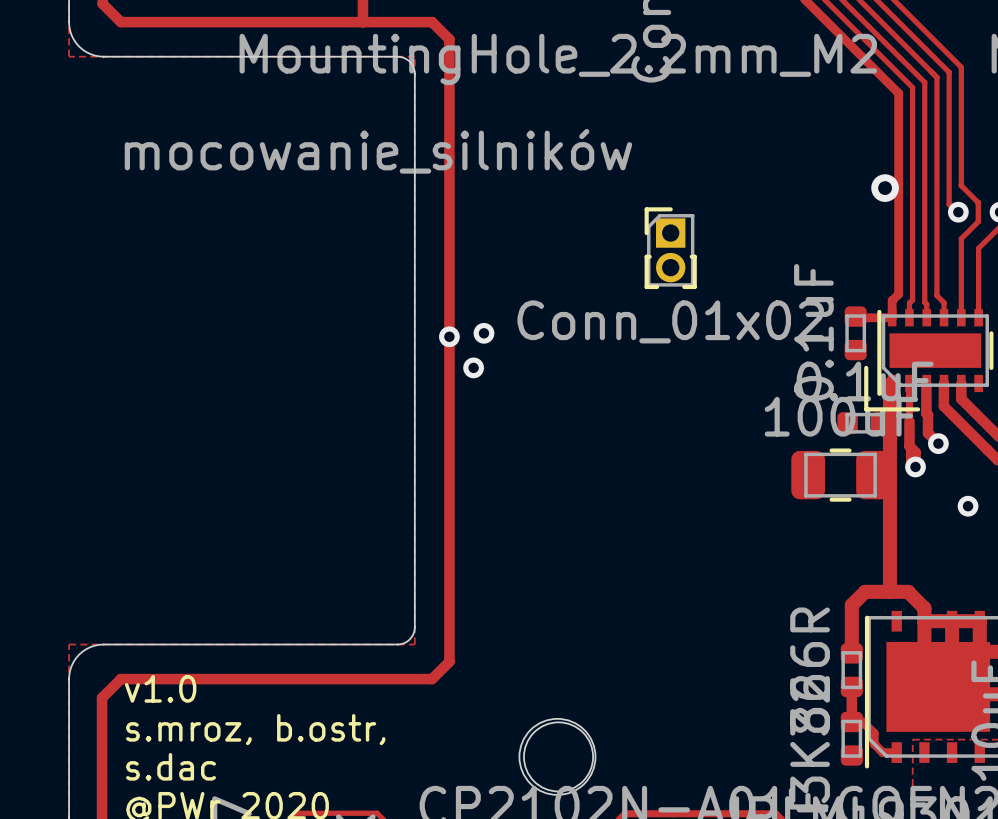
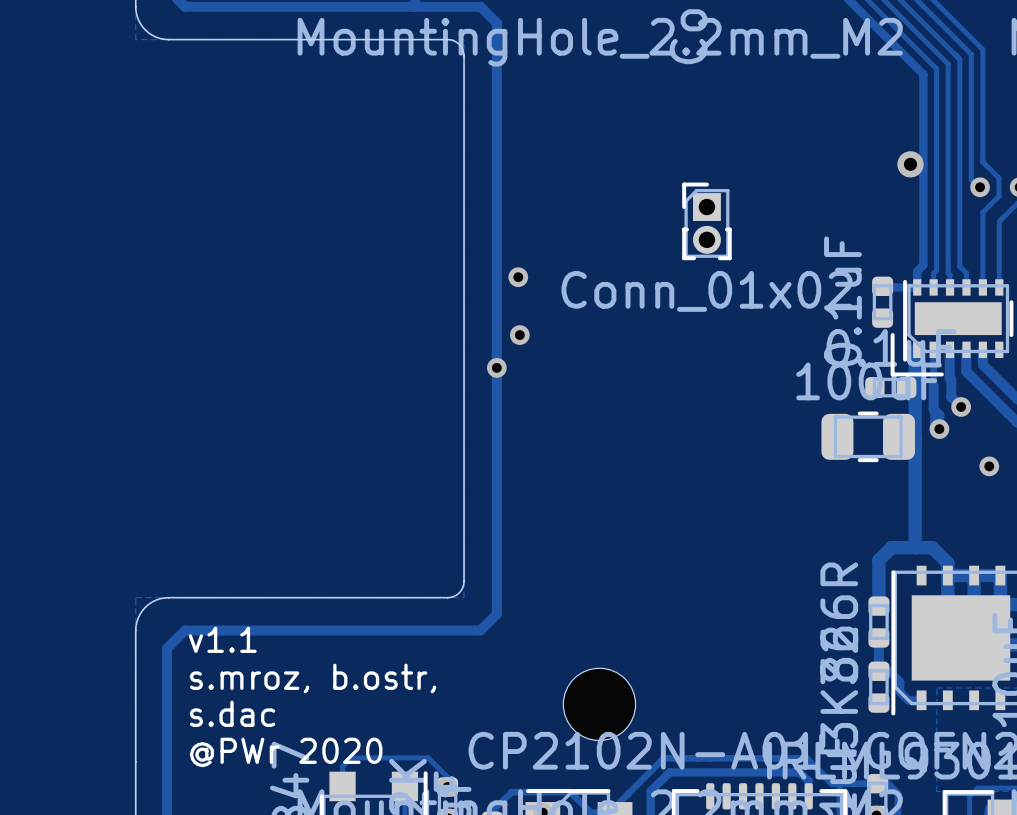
via: none -> (518, 277)
via: (483, 333) -> none
via: (449, 336) -> none
via: none -> (496, 367)
text: v1.0 (160, 688) -> v1.1 (222, 639)
part: mocowanie_silników (558, 756) -> none

